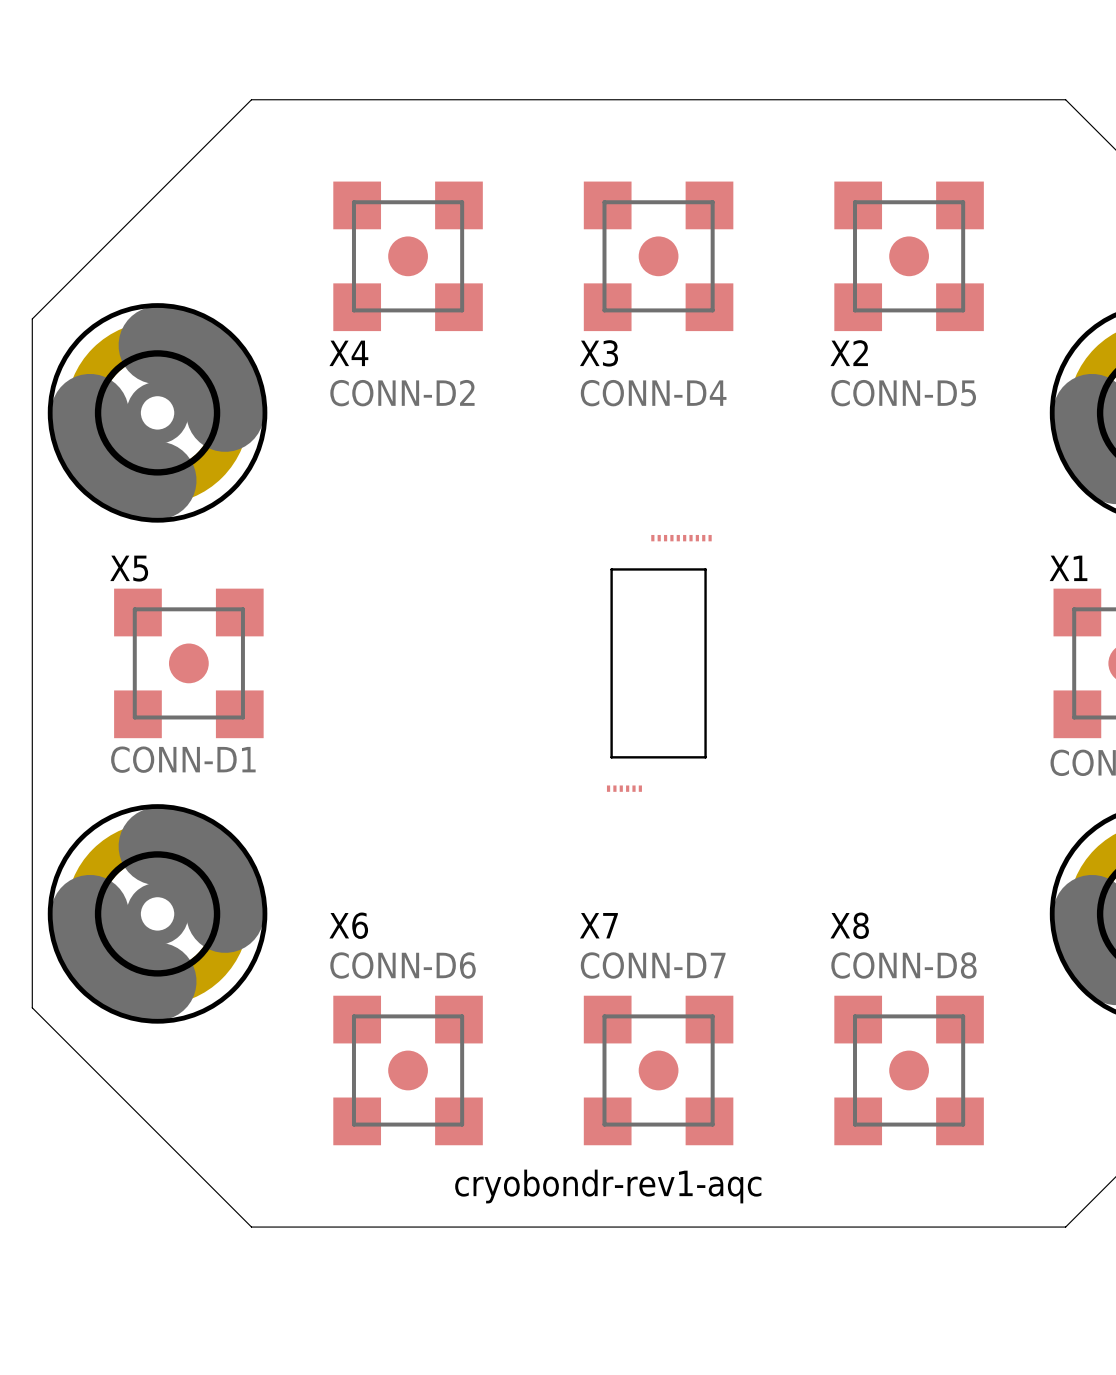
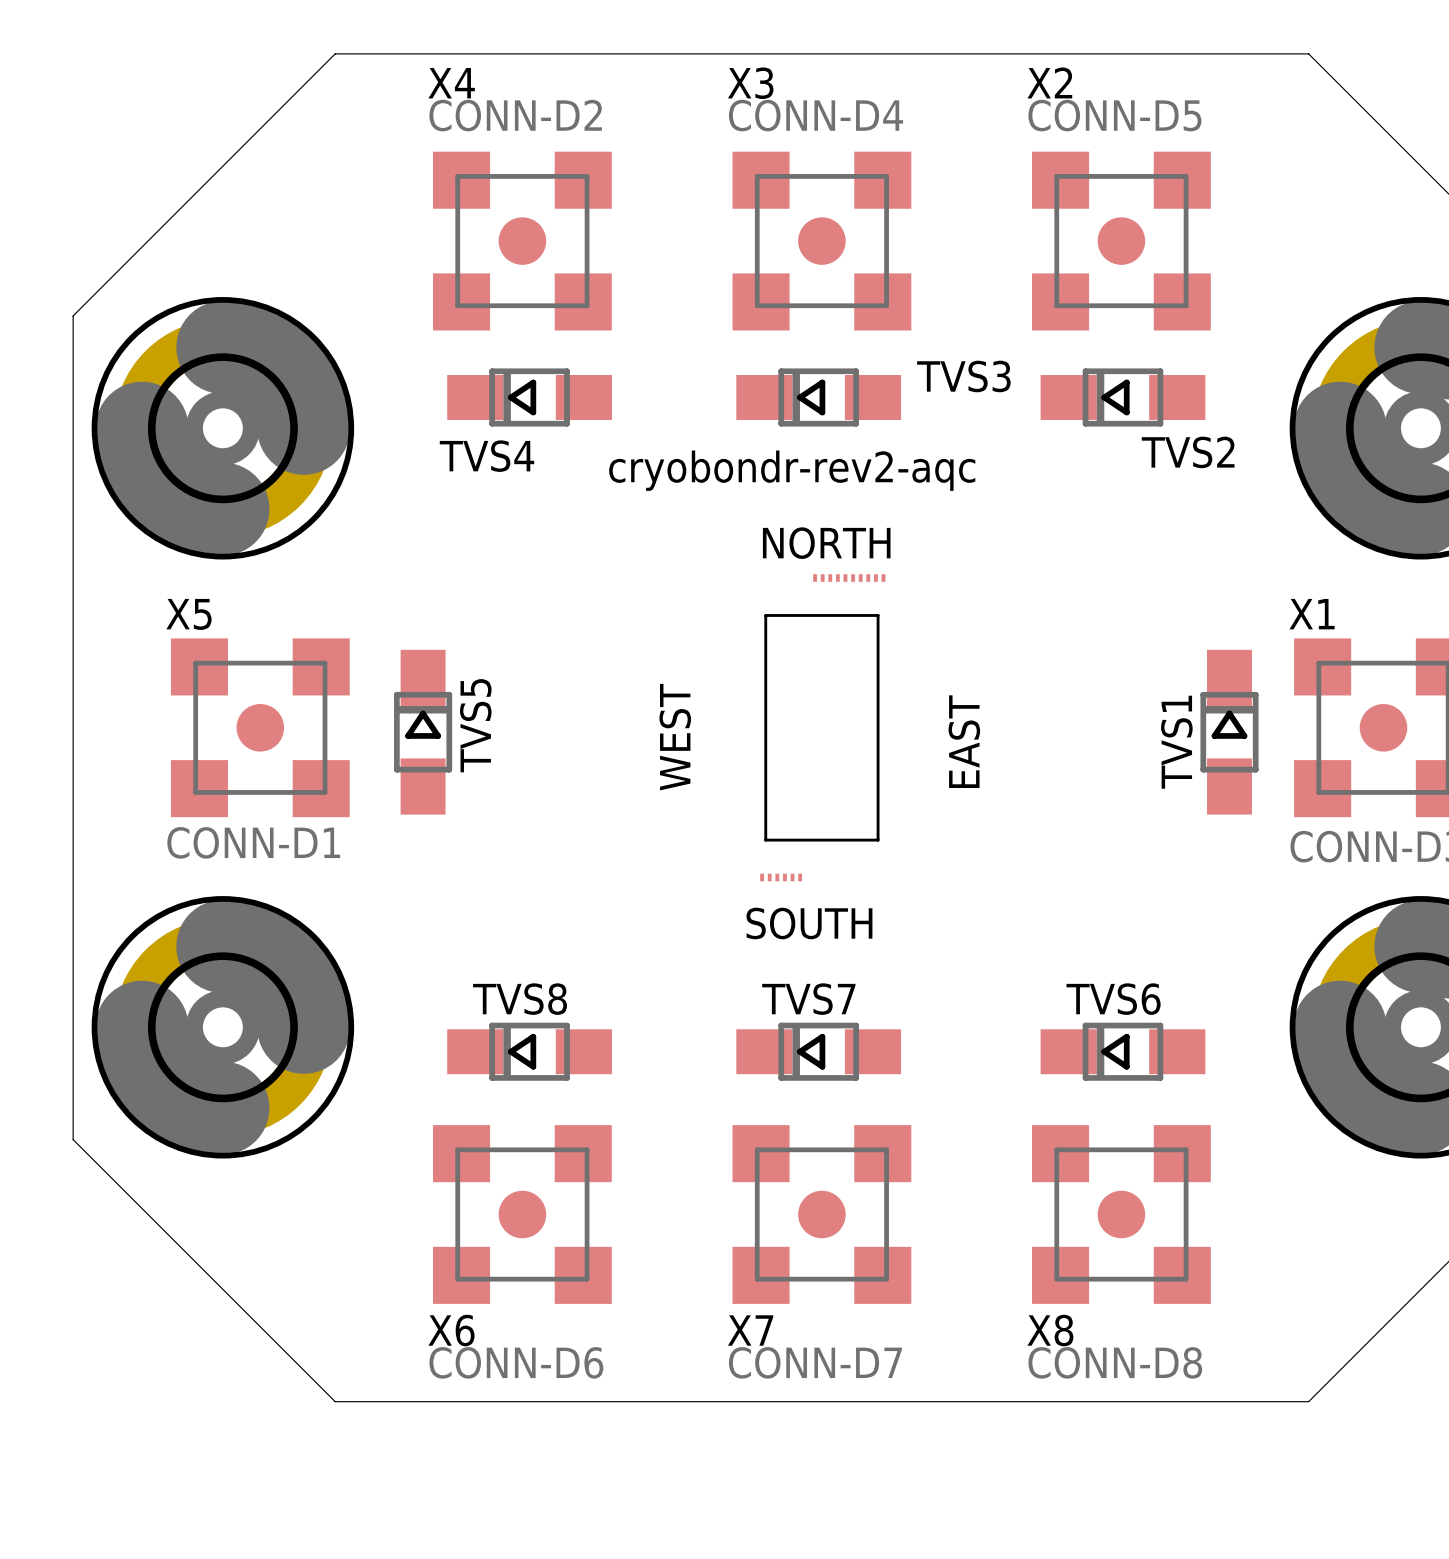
X4 name position: X4 (348, 353) -> X4 (451, 83)
X3 name position: X3 (599, 353) -> X3 (750, 83)
X2 name position: X2 (849, 353) -> X2 (1049, 82)
TVS4: none -> (529, 397)
TVS3: none -> (818, 397)
TVS2: none -> (1122, 397)
X4 value position: CONN-D2 (402, 393) -> CONN-D2 (515, 115)
X3 value position: CONN-D4 (653, 393) -> CONN-D4 (816, 115)
X2 value position: CONN-D5 (903, 393) -> CONN-D5 (1114, 115)
text: none -> cryobondr-rev2-aqc (792, 470)
text: none -> NORTH (826, 543)
TVS5: none -> (423, 732)
TVS1: none -> (1229, 732)
text: none -> WEST (675, 737)
text: none -> EAST (964, 741)
text: none -> SOUTH (809, 923)
X6 name position: X6 (348, 925) -> X6 (451, 1330)
X7 name position: X7 (598, 925) -> X7 (750, 1330)
X8 name position: X8 (849, 925) -> X8 (1050, 1330)
TVS8: none -> (529, 1051)
TVS7: none -> (818, 1051)
TVS6: none -> (1122, 1051)
X6 value position: CONN-D6 (403, 965) -> CONN-D6 (516, 1362)
X7 value position: CONN-D7 (653, 965) -> CONN-D7 (815, 1362)
X8 value position: CONN-D8 (903, 965) -> CONN-D8 (1115, 1362)
text: cryobondr-rev1-aqc (608, 1186) -> none

